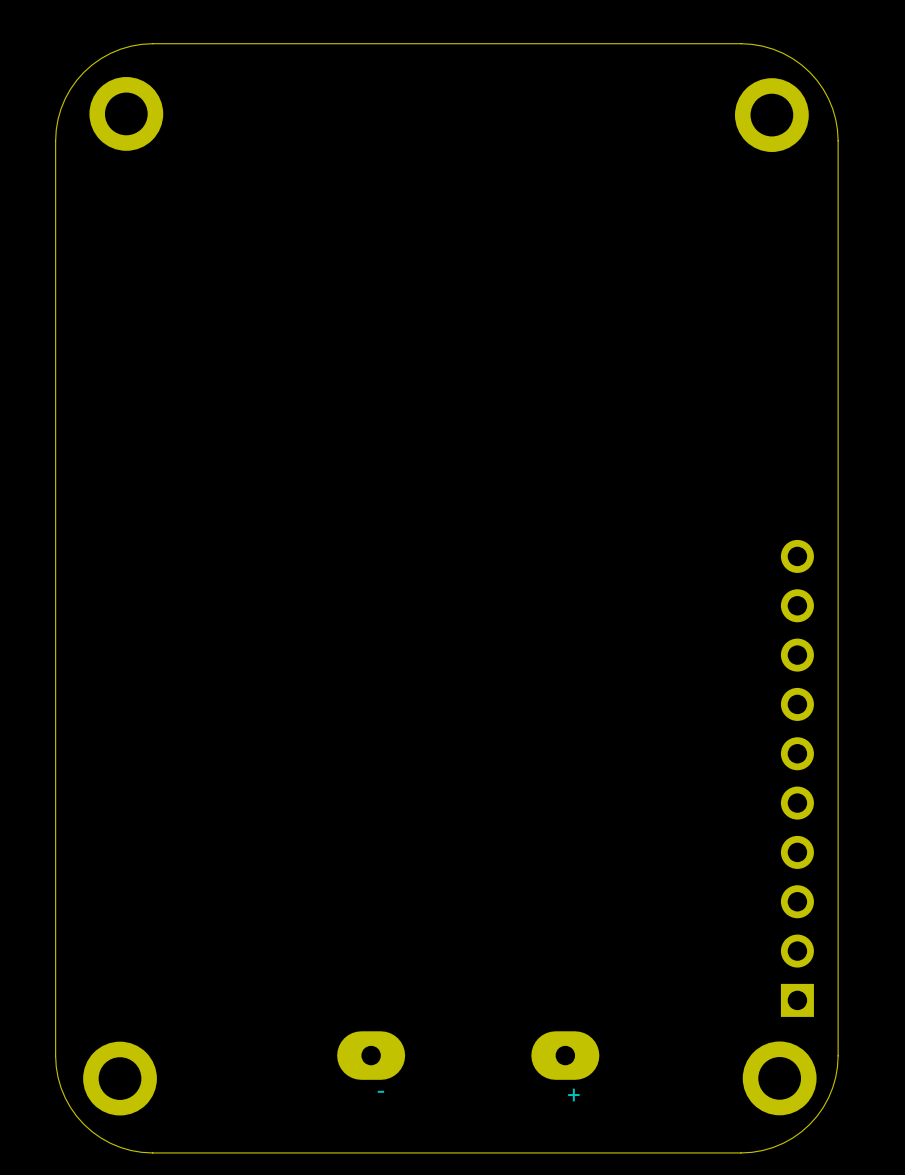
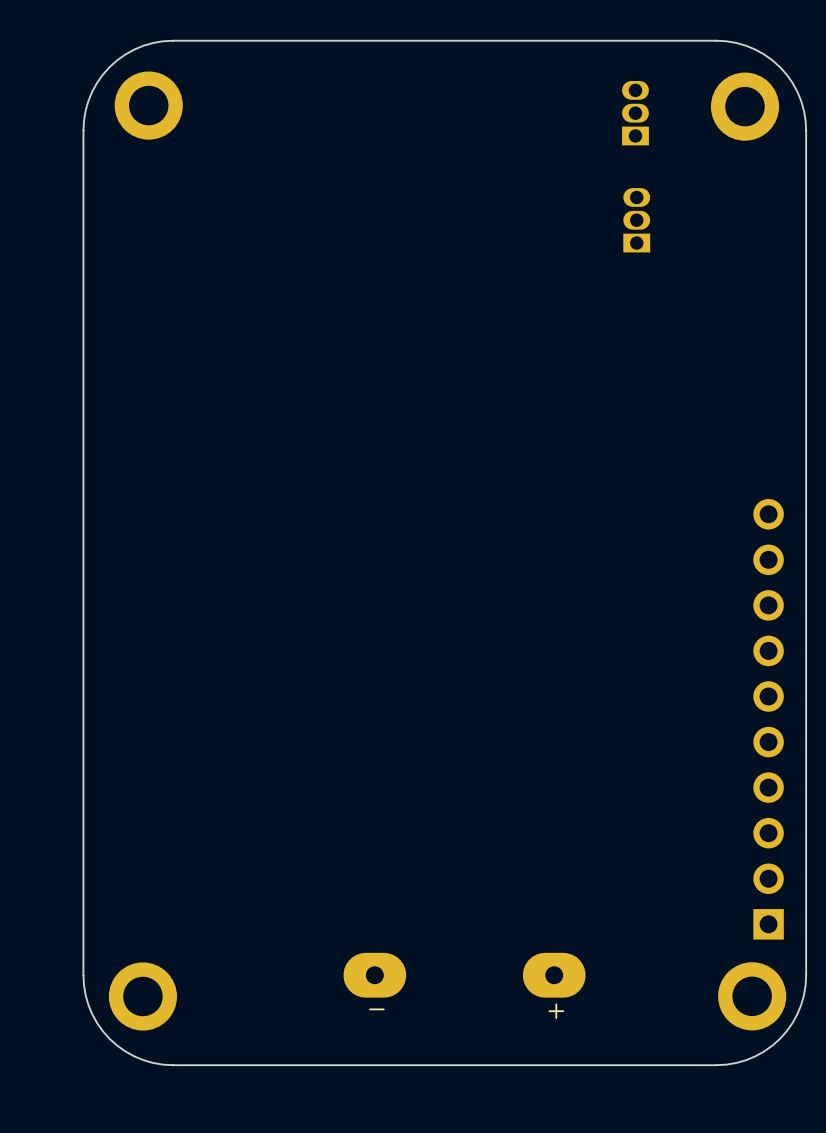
part: none -> (635, 113)
part: none -> (636, 220)

